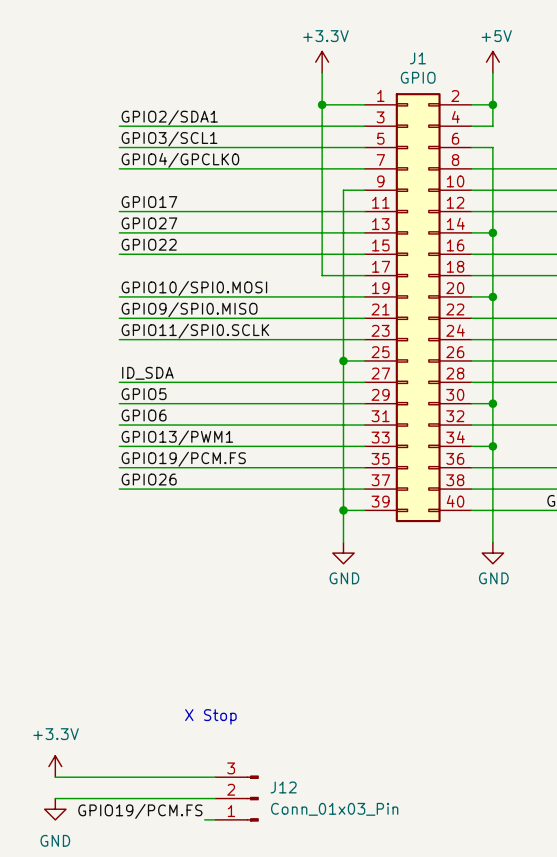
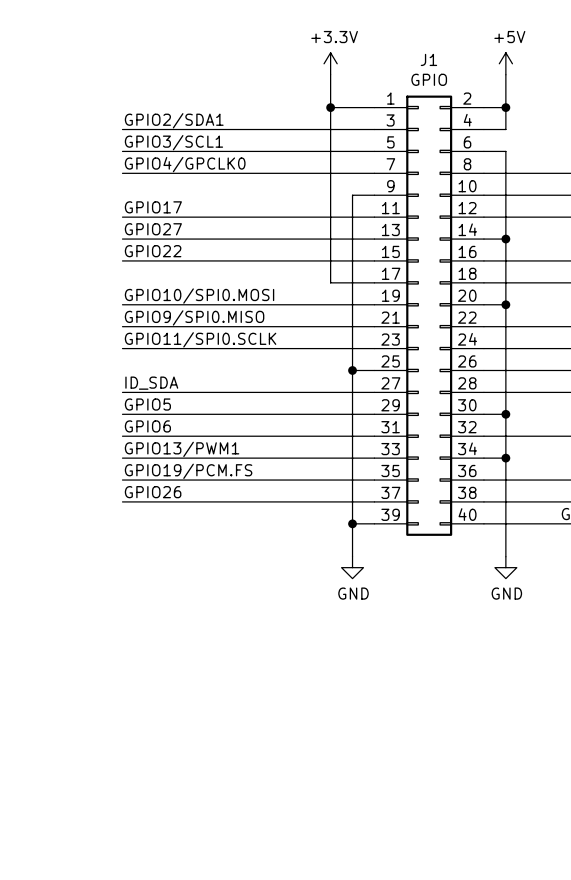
text: X Stop (210, 716) -> none
power symbol: +3.3V (55, 766) -> none
wire: (55, 777) (215, 777) -> none
wire: (55, 798) (215, 798) -> none
J12: Conn_01x03_Pin (237, 798) -> none
power symbol: GND (55, 809) -> none
label: GPIO19/PCM.FS (140, 811) -> none
wire: (204, 819) (215, 819) -> none

